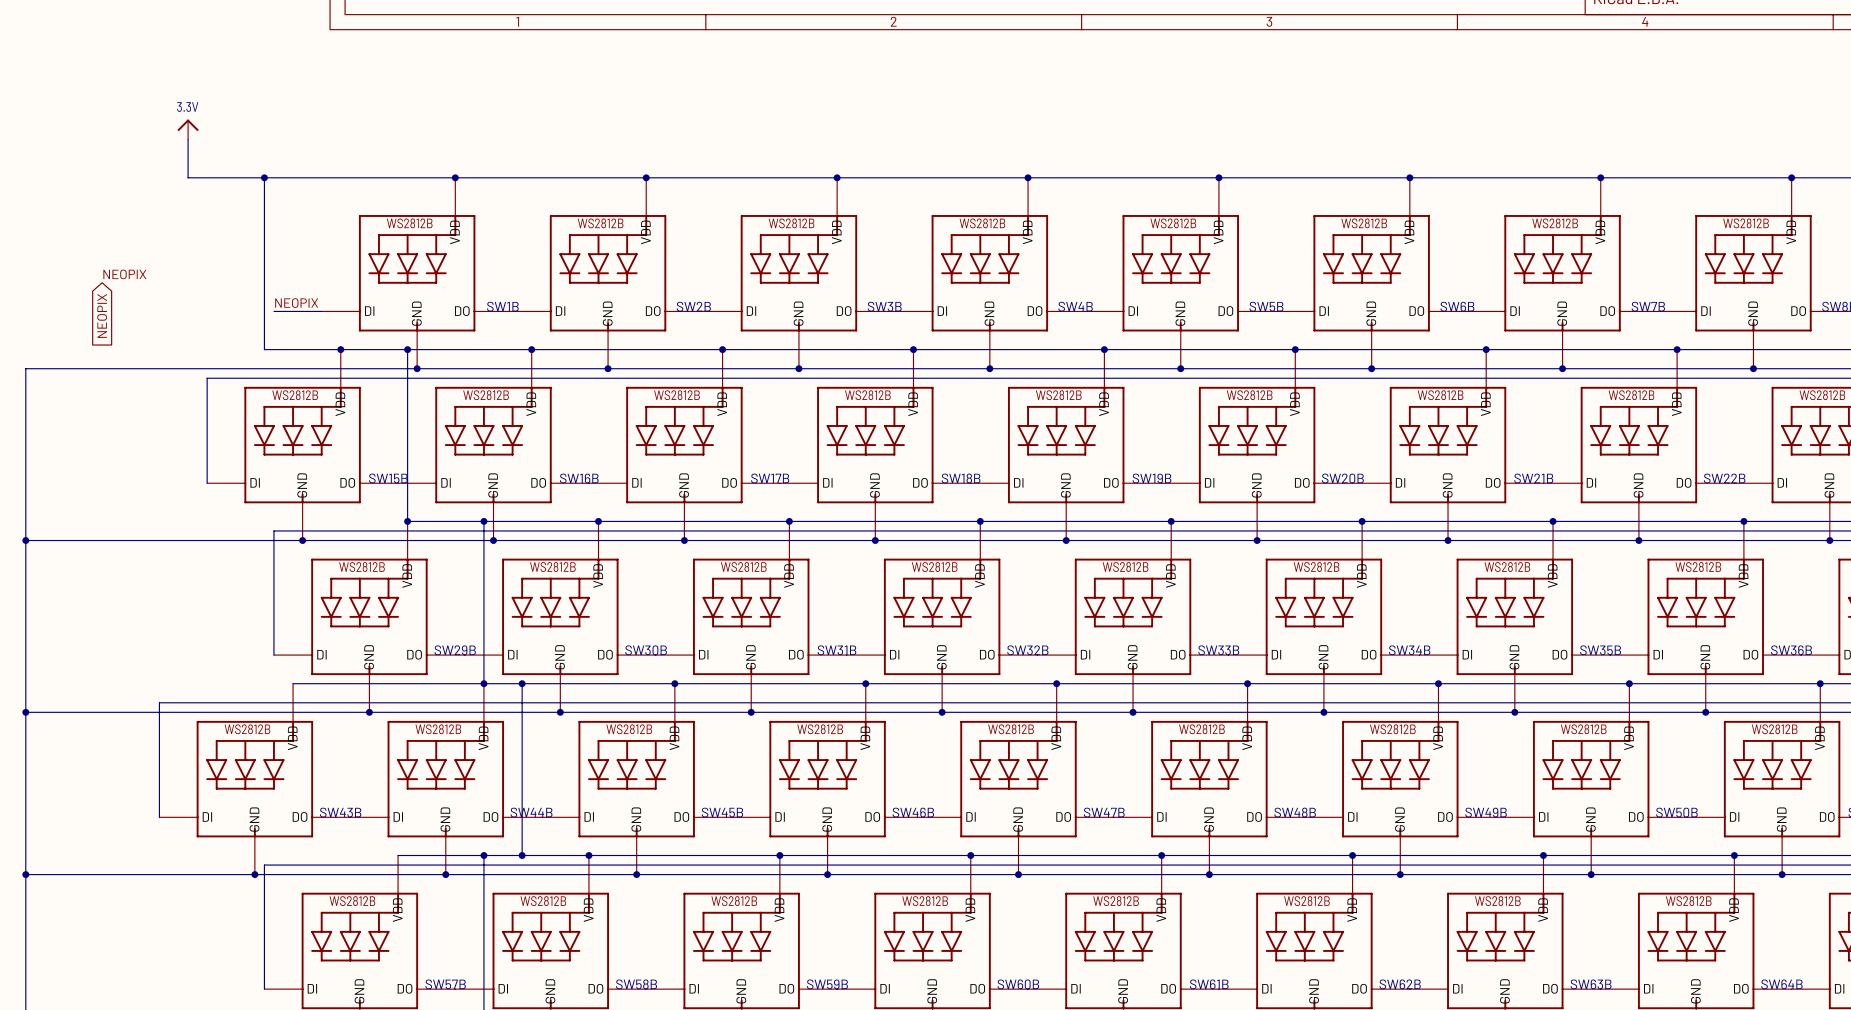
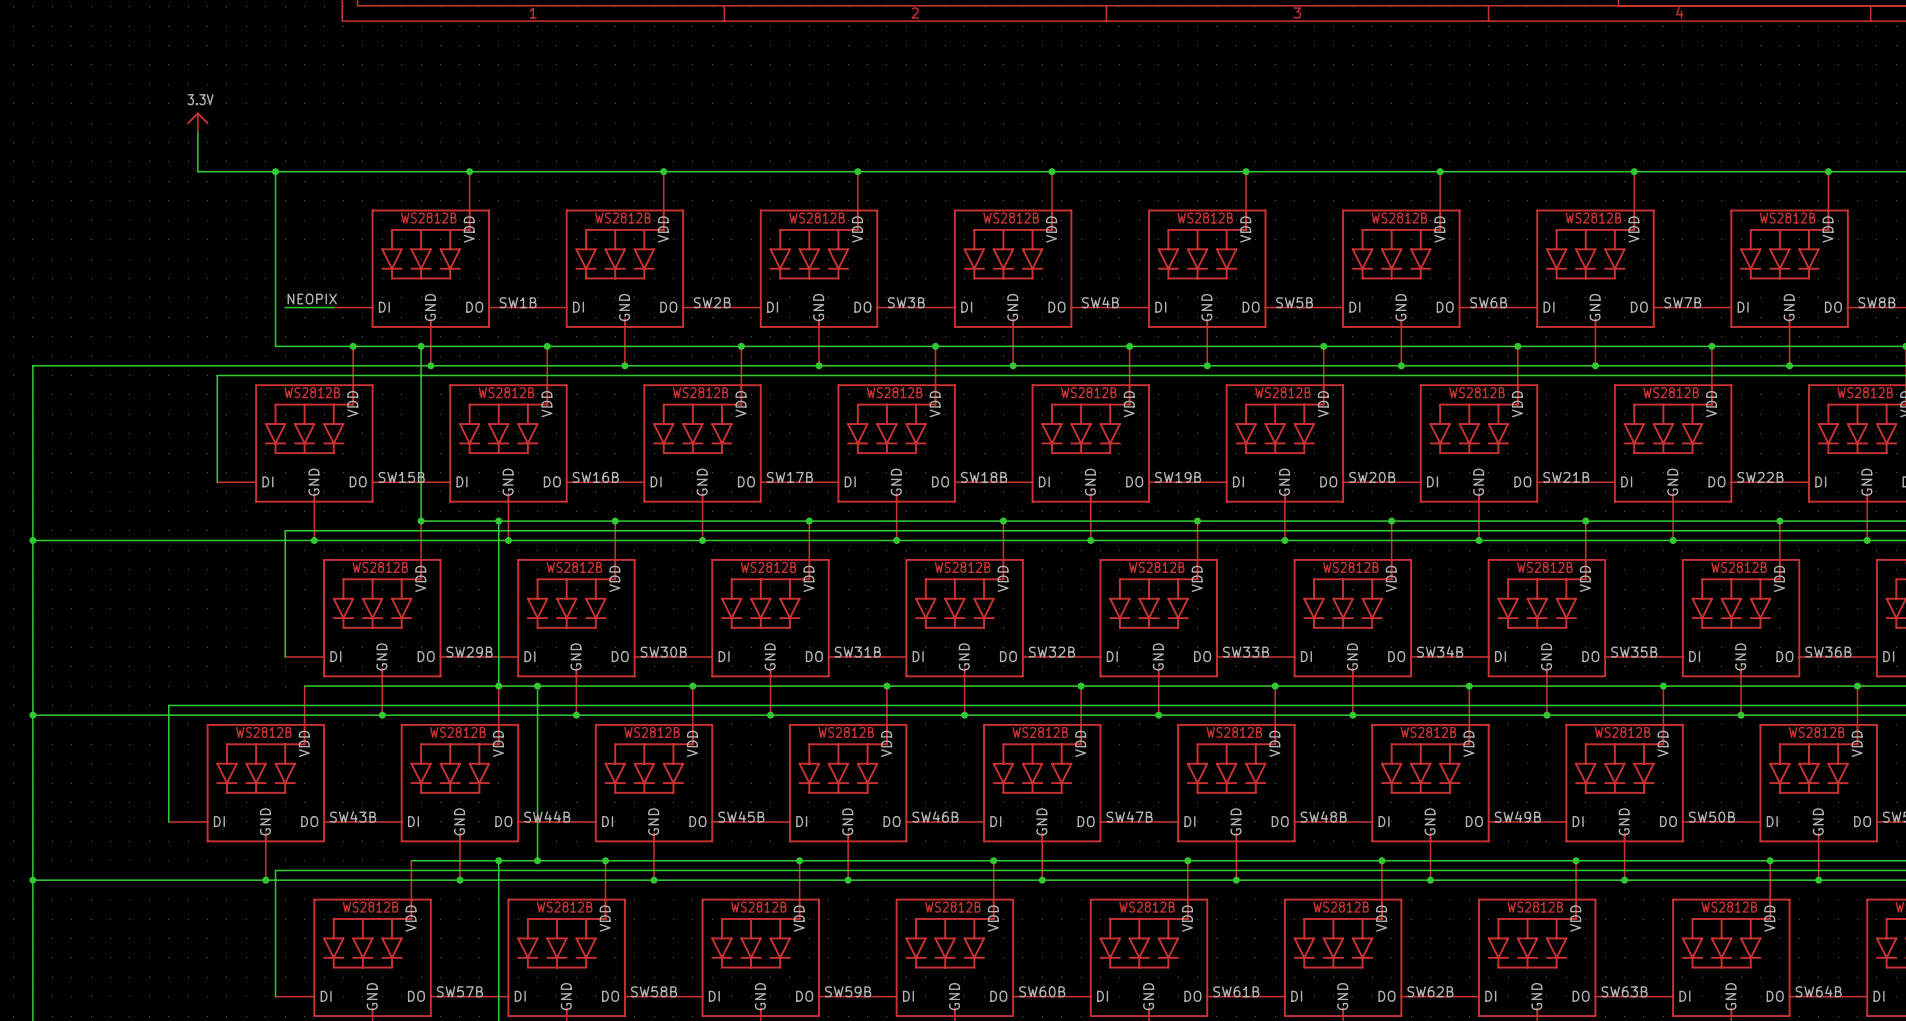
label: NEOPIX (124, 274) -> none
global label: NEOPIX (102, 315) -> none

